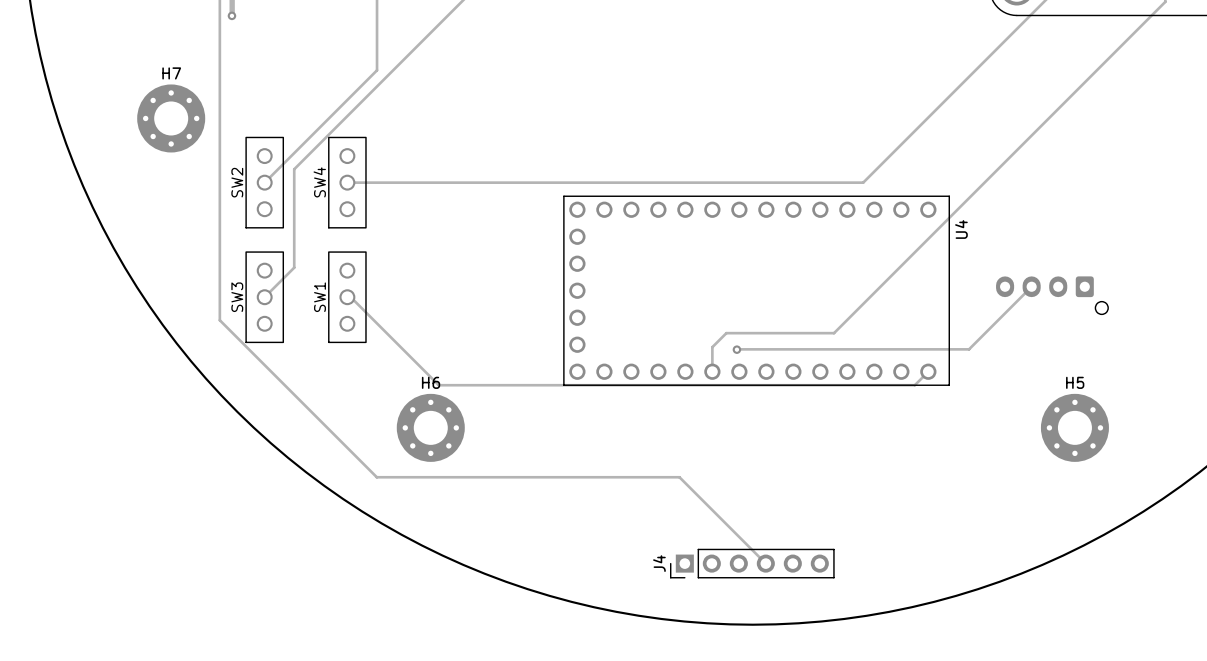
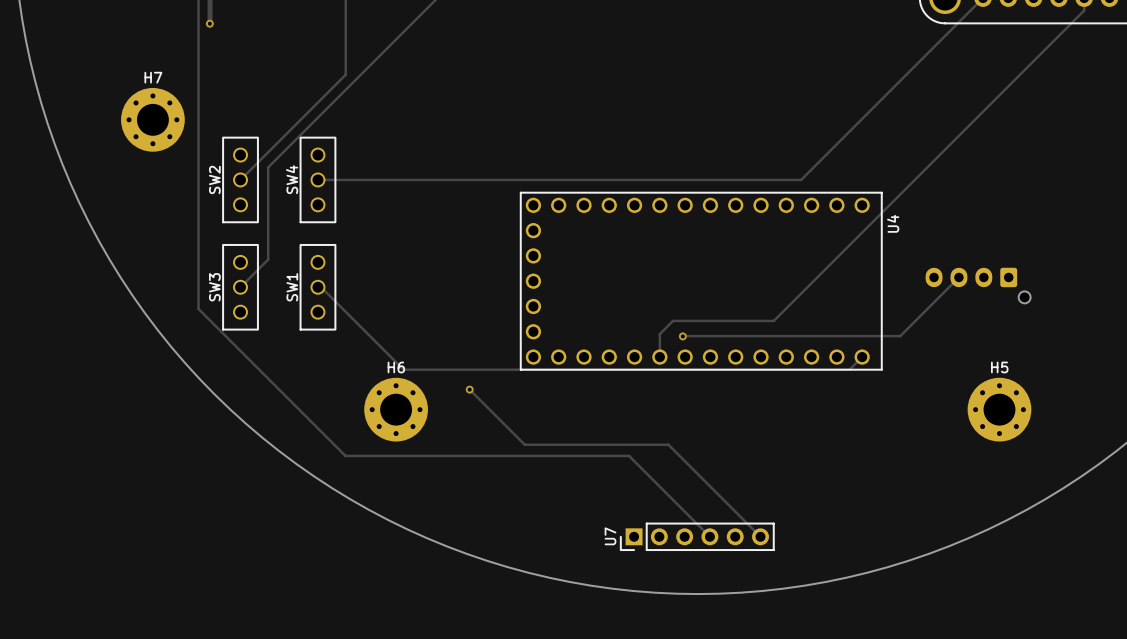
track: none -> (469, 389) (524, 444) (668, 444) (760, 536)
via: none -> (469, 389)
J4 name: J4 (659, 563) -> U7 (610, 536)

